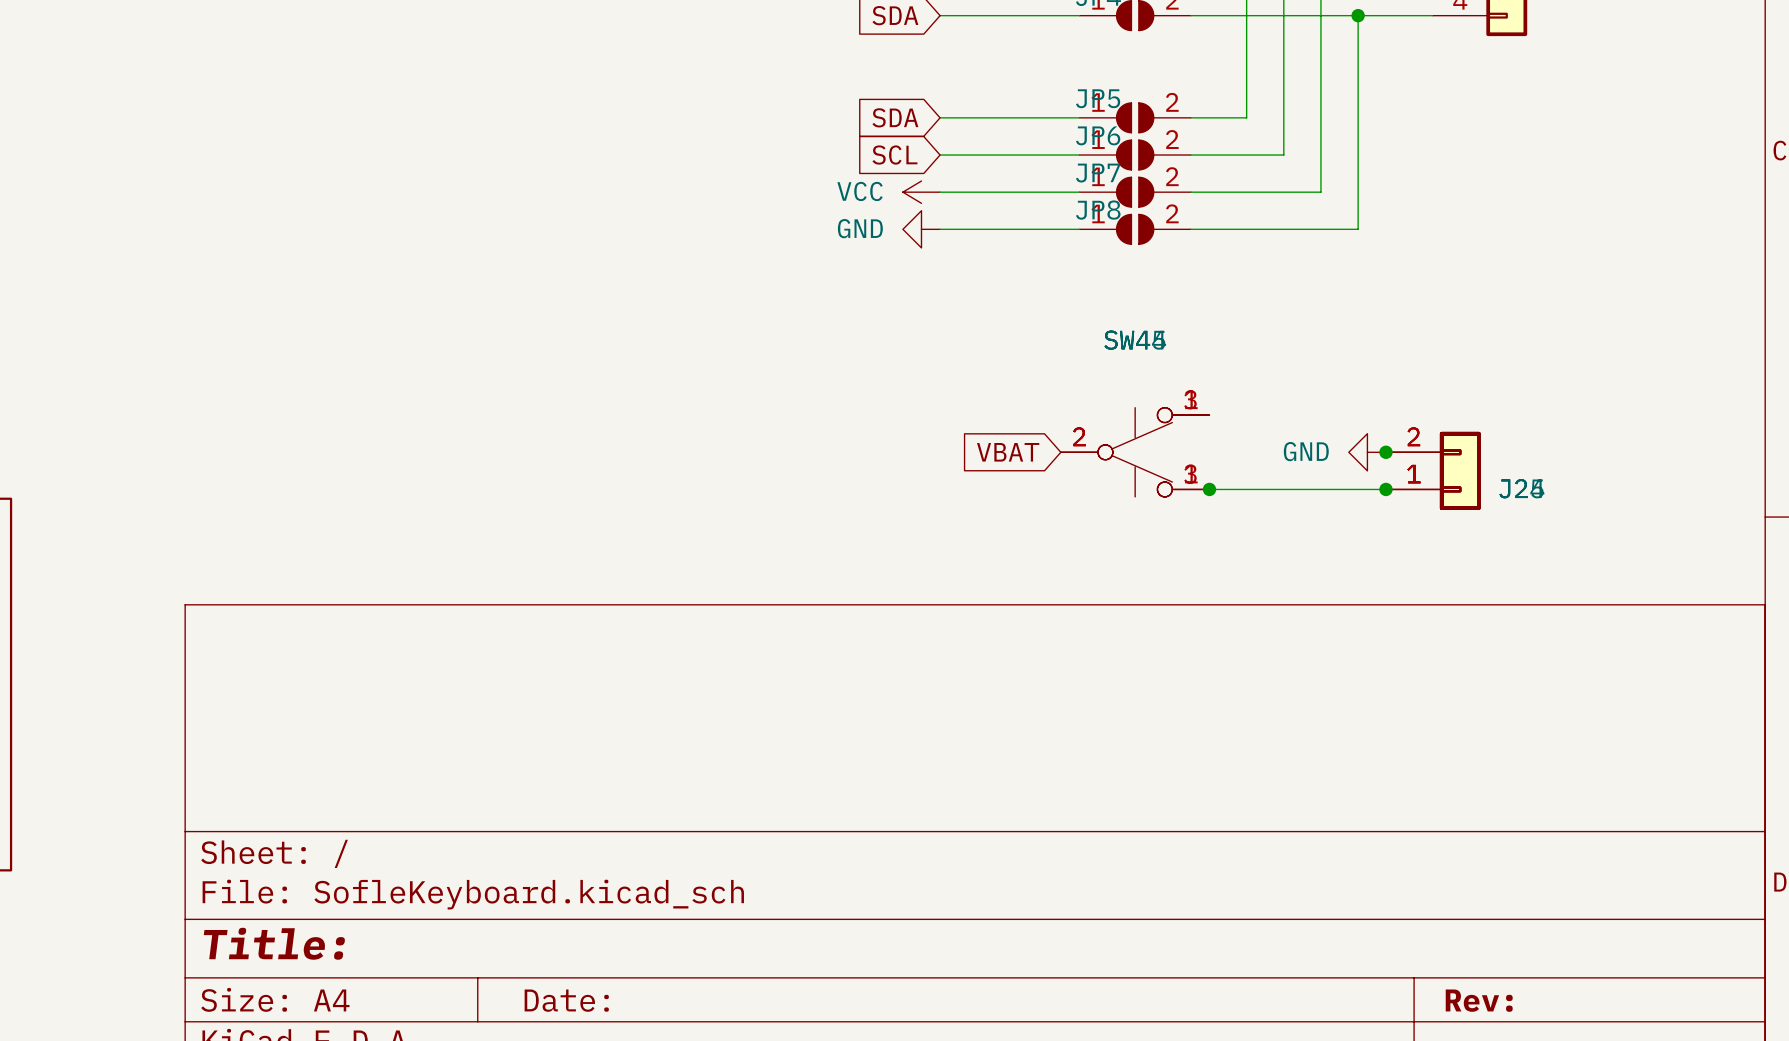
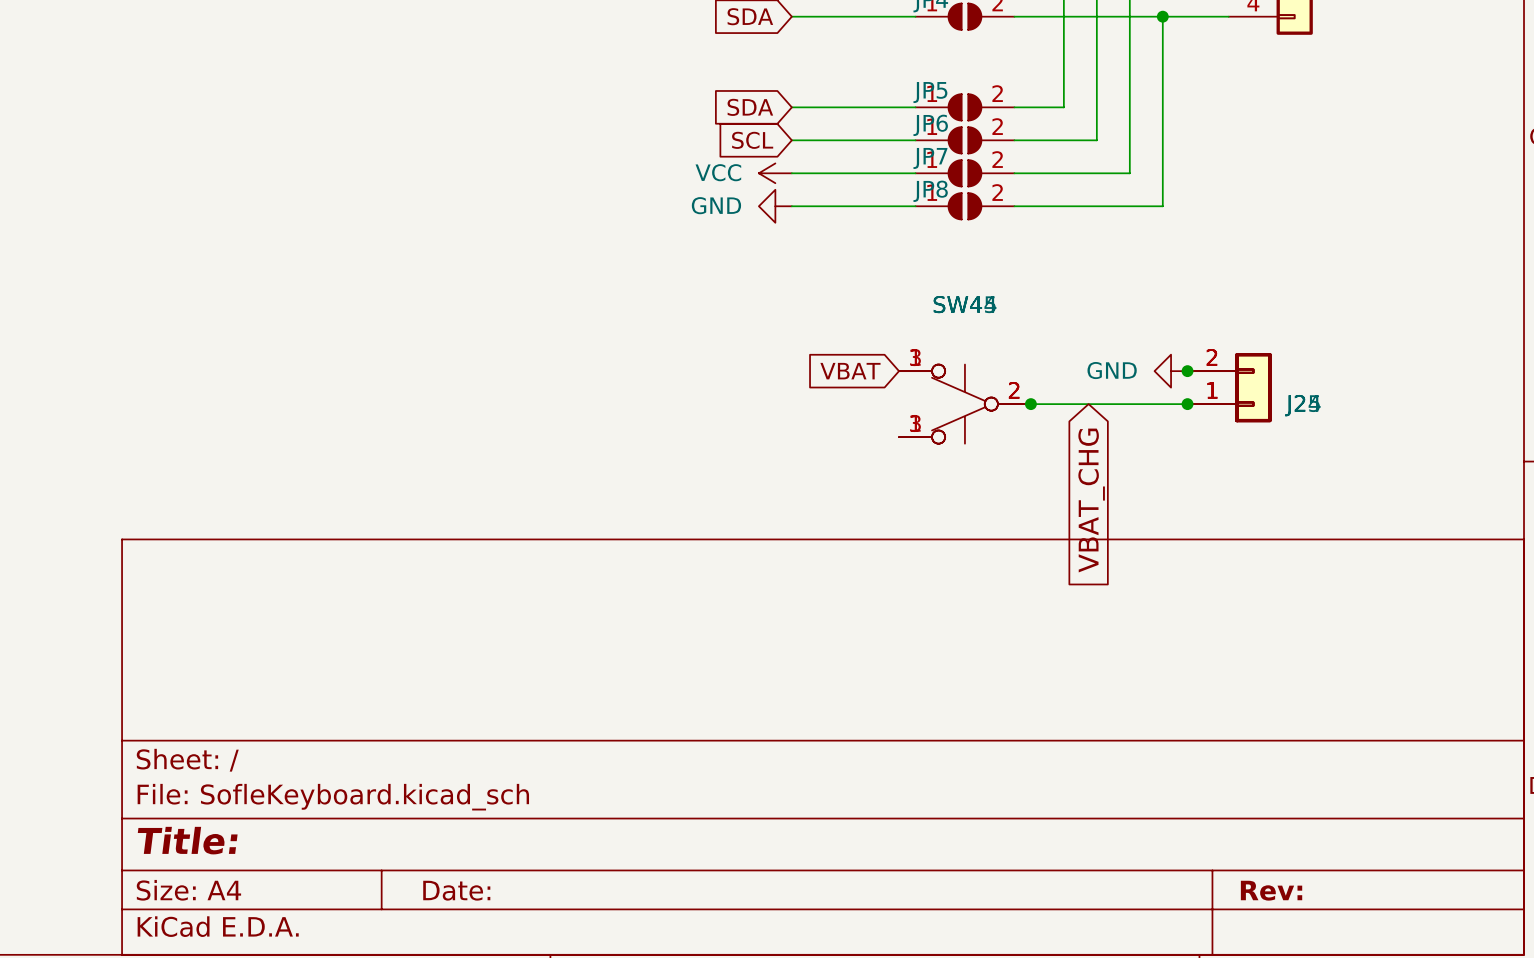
global label position: VBAT (1008, 452) -> VBAT (850, 371)
part flip: as is (1135, 452) -> left-right (964, 404)
part flip: as is (1135, 452) -> left-right (964, 404)
power symbol position: GND (1367, 452) -> GND (1171, 371)
part position: (1433, 470) -> (1229, 387)
part position: (1433, 470) -> (1229, 387)
wire: (1209, 489) (1385, 489) -> (1030, 404) (1187, 404)
junction position: (1209, 489) -> (1030, 404)
junction position: (1385, 489) -> (1187, 371)
global label: none -> VBAT_CHG (1091, 500)

